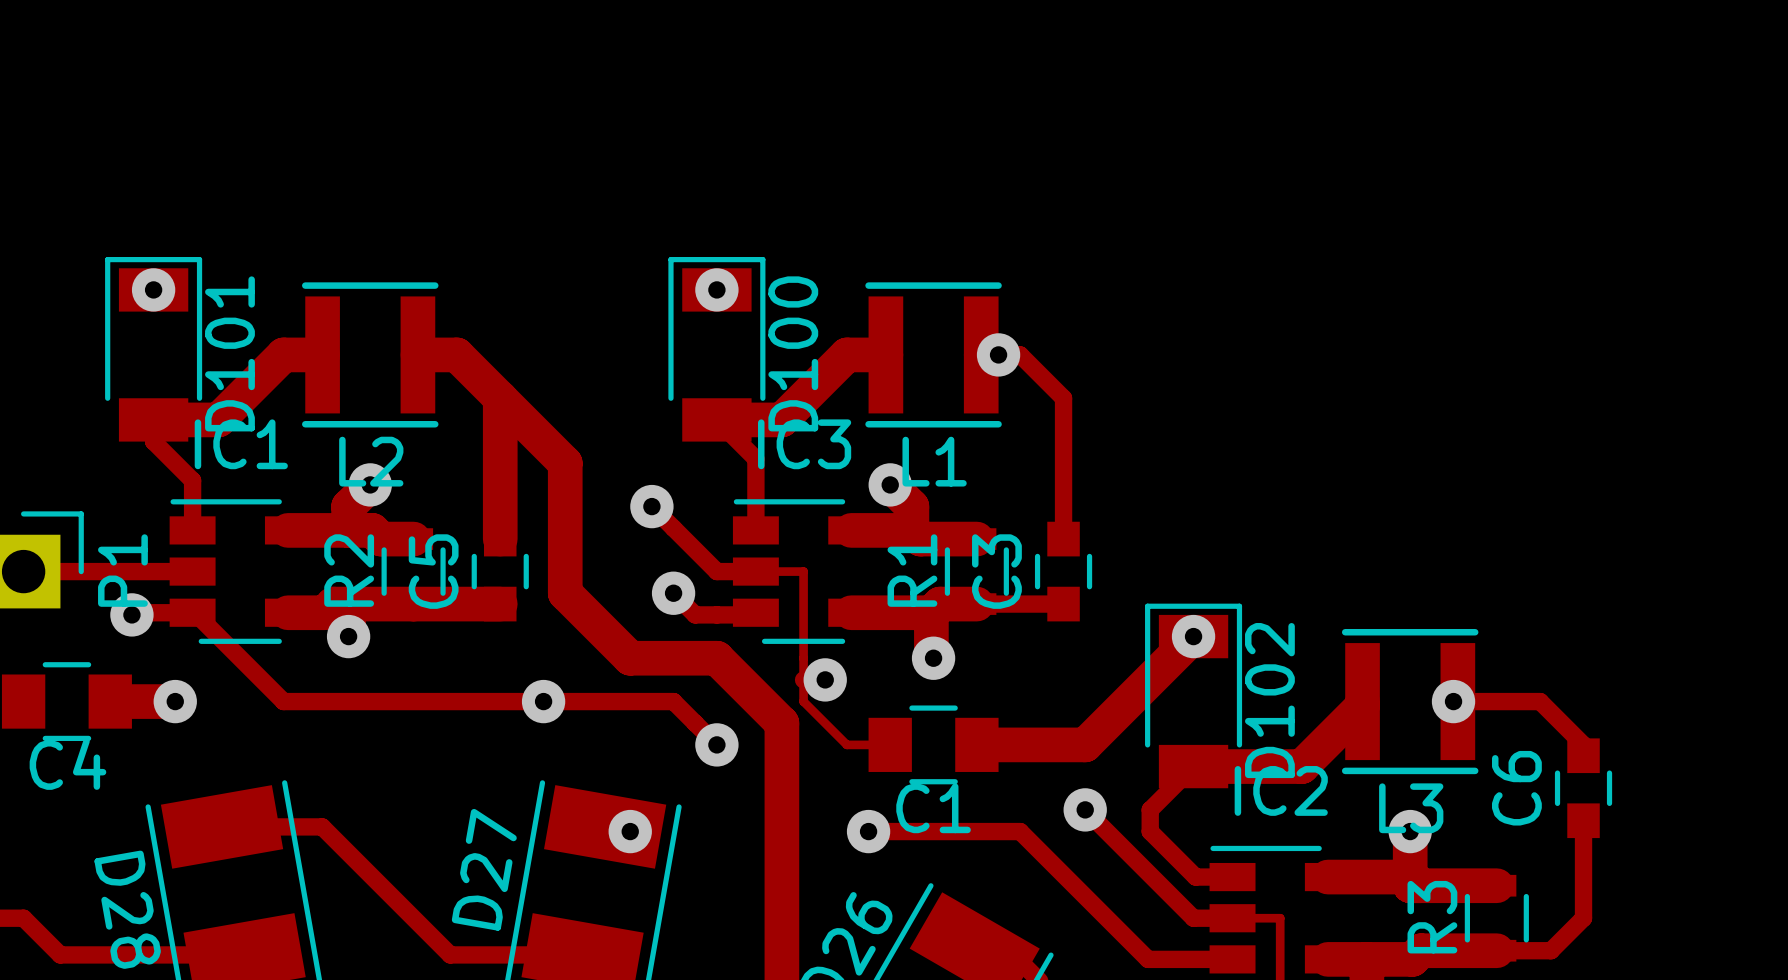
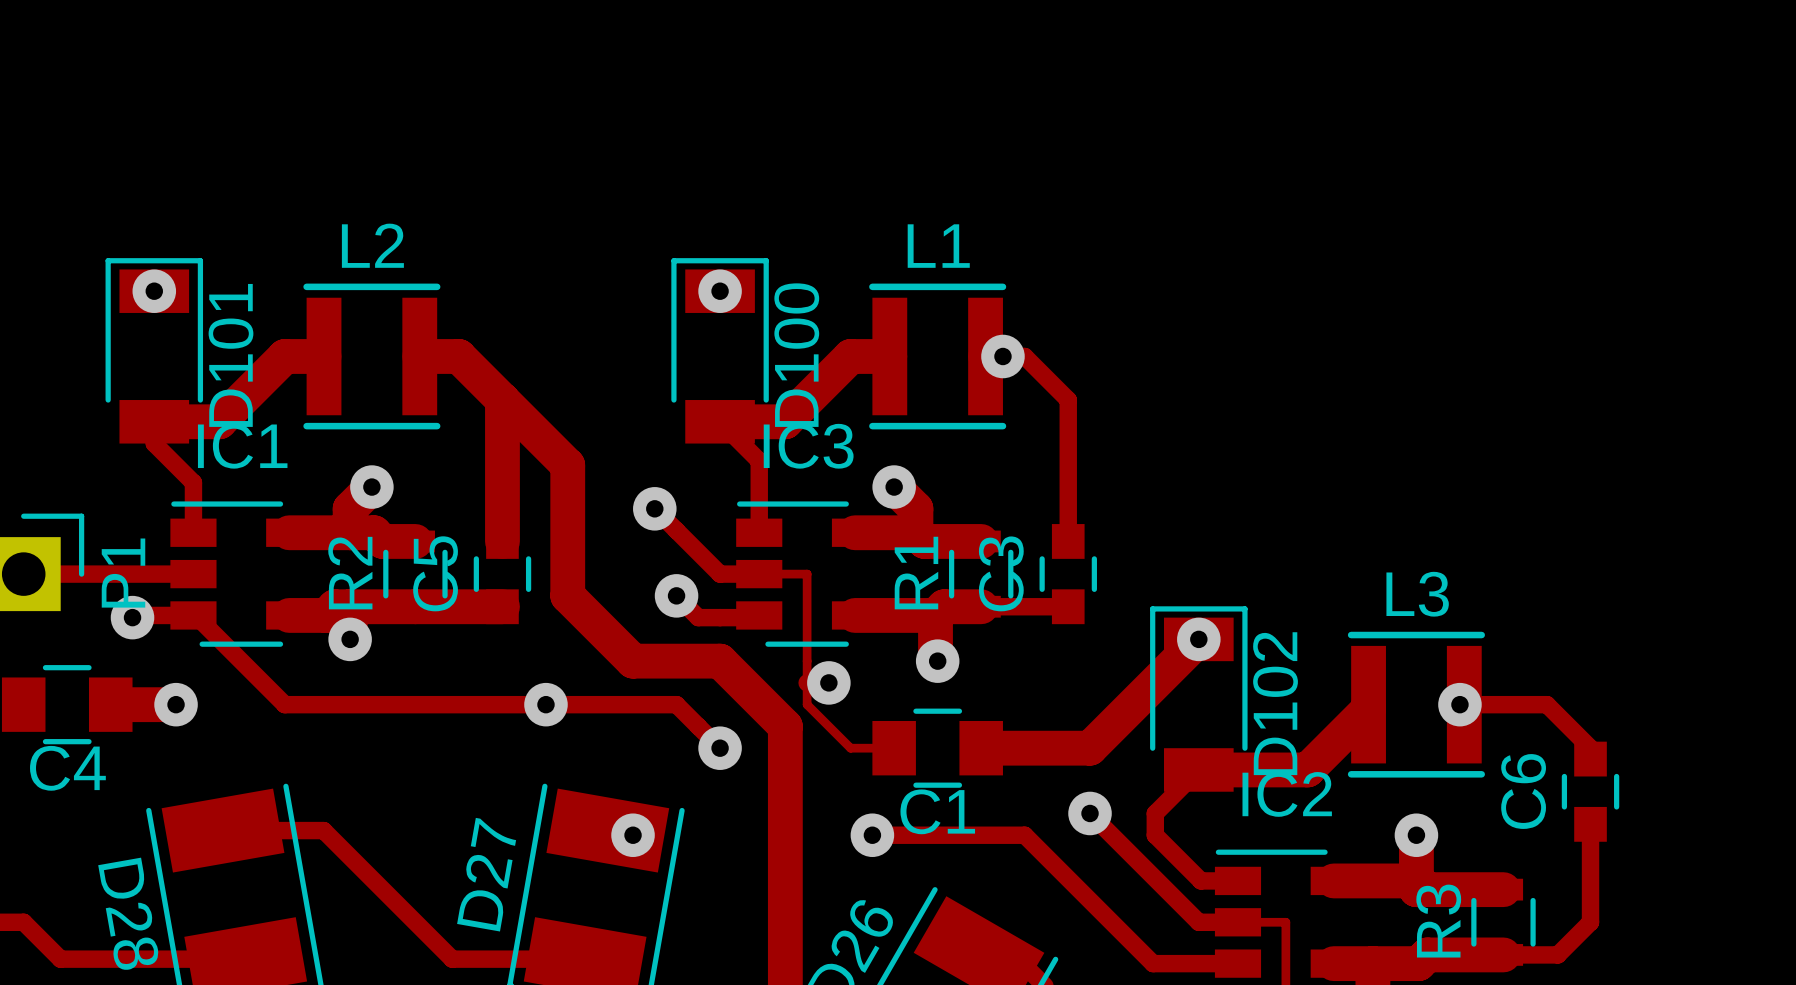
L2 name position: L2 (371, 461) -> L2 (372, 245)
L1 name position: L1 (934, 461) -> L1 (938, 246)
L3 name position: L3 (1411, 808) -> L3 (1417, 594)

